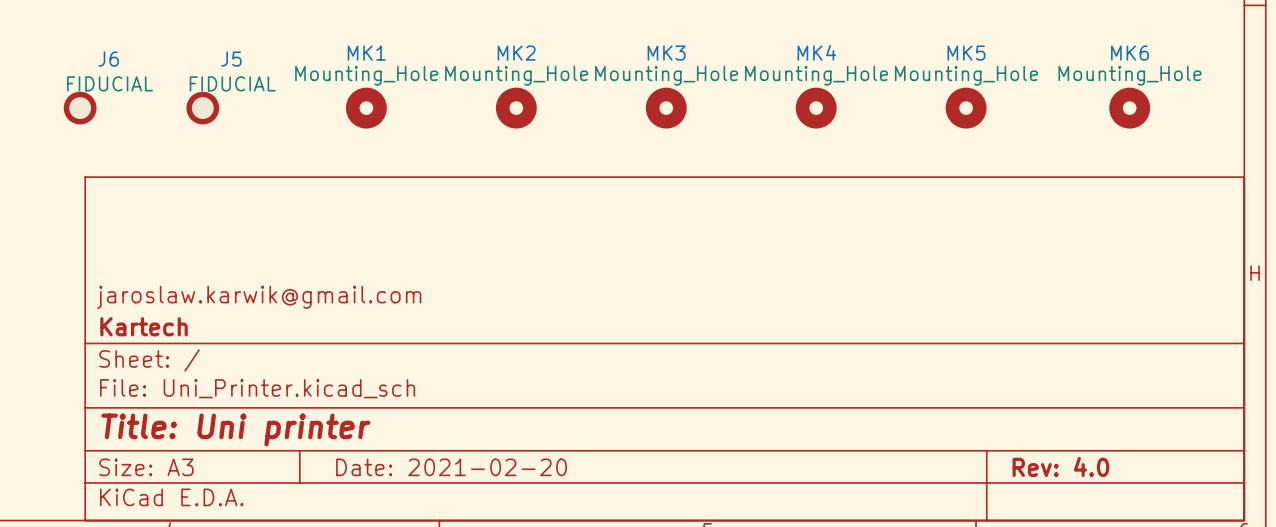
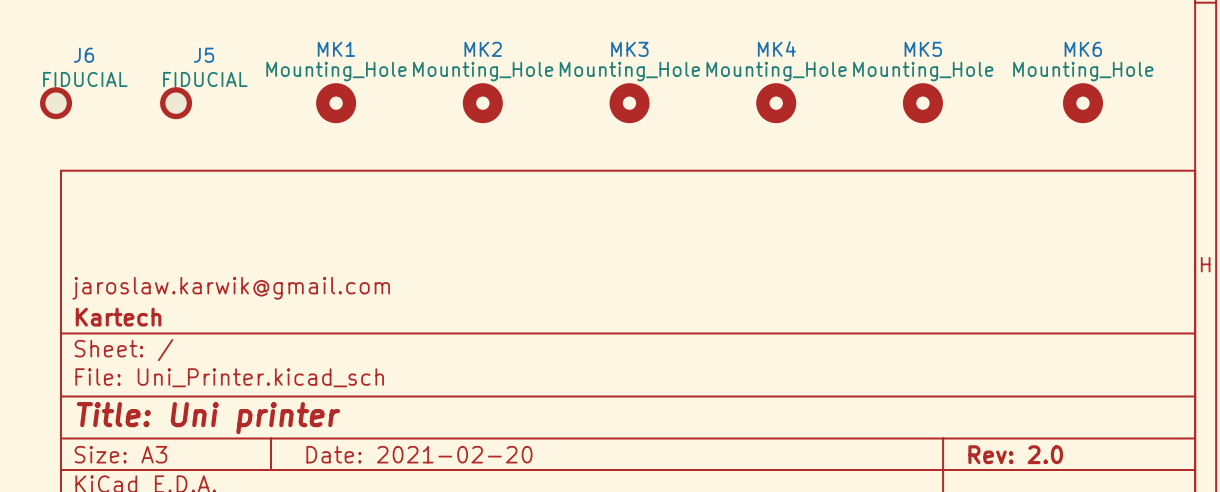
title block: Rev: 4.0 (1060, 466) -> Rev: 2.0 (1015, 454)

